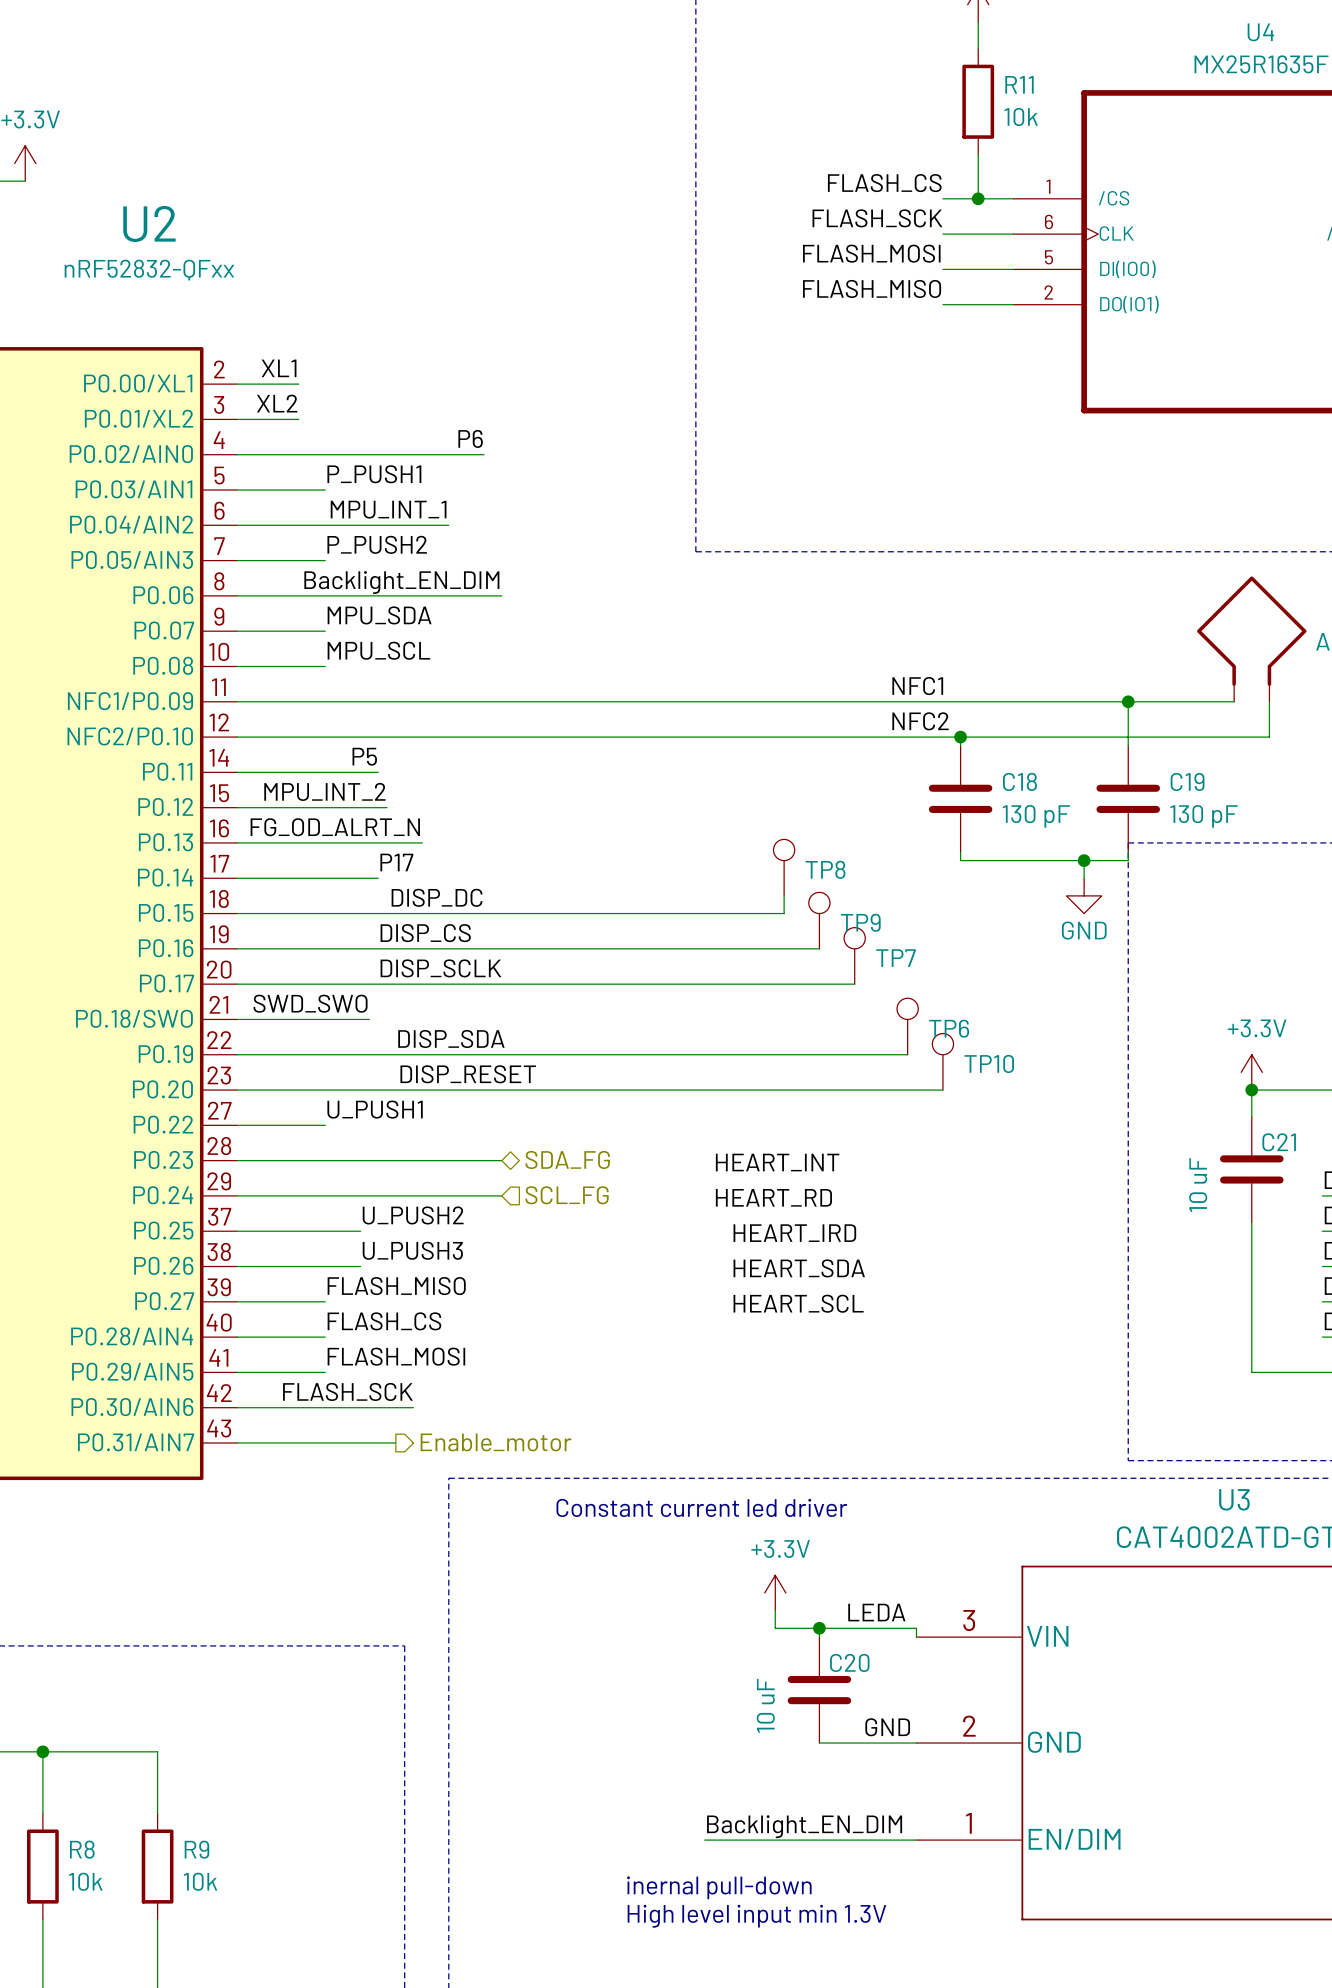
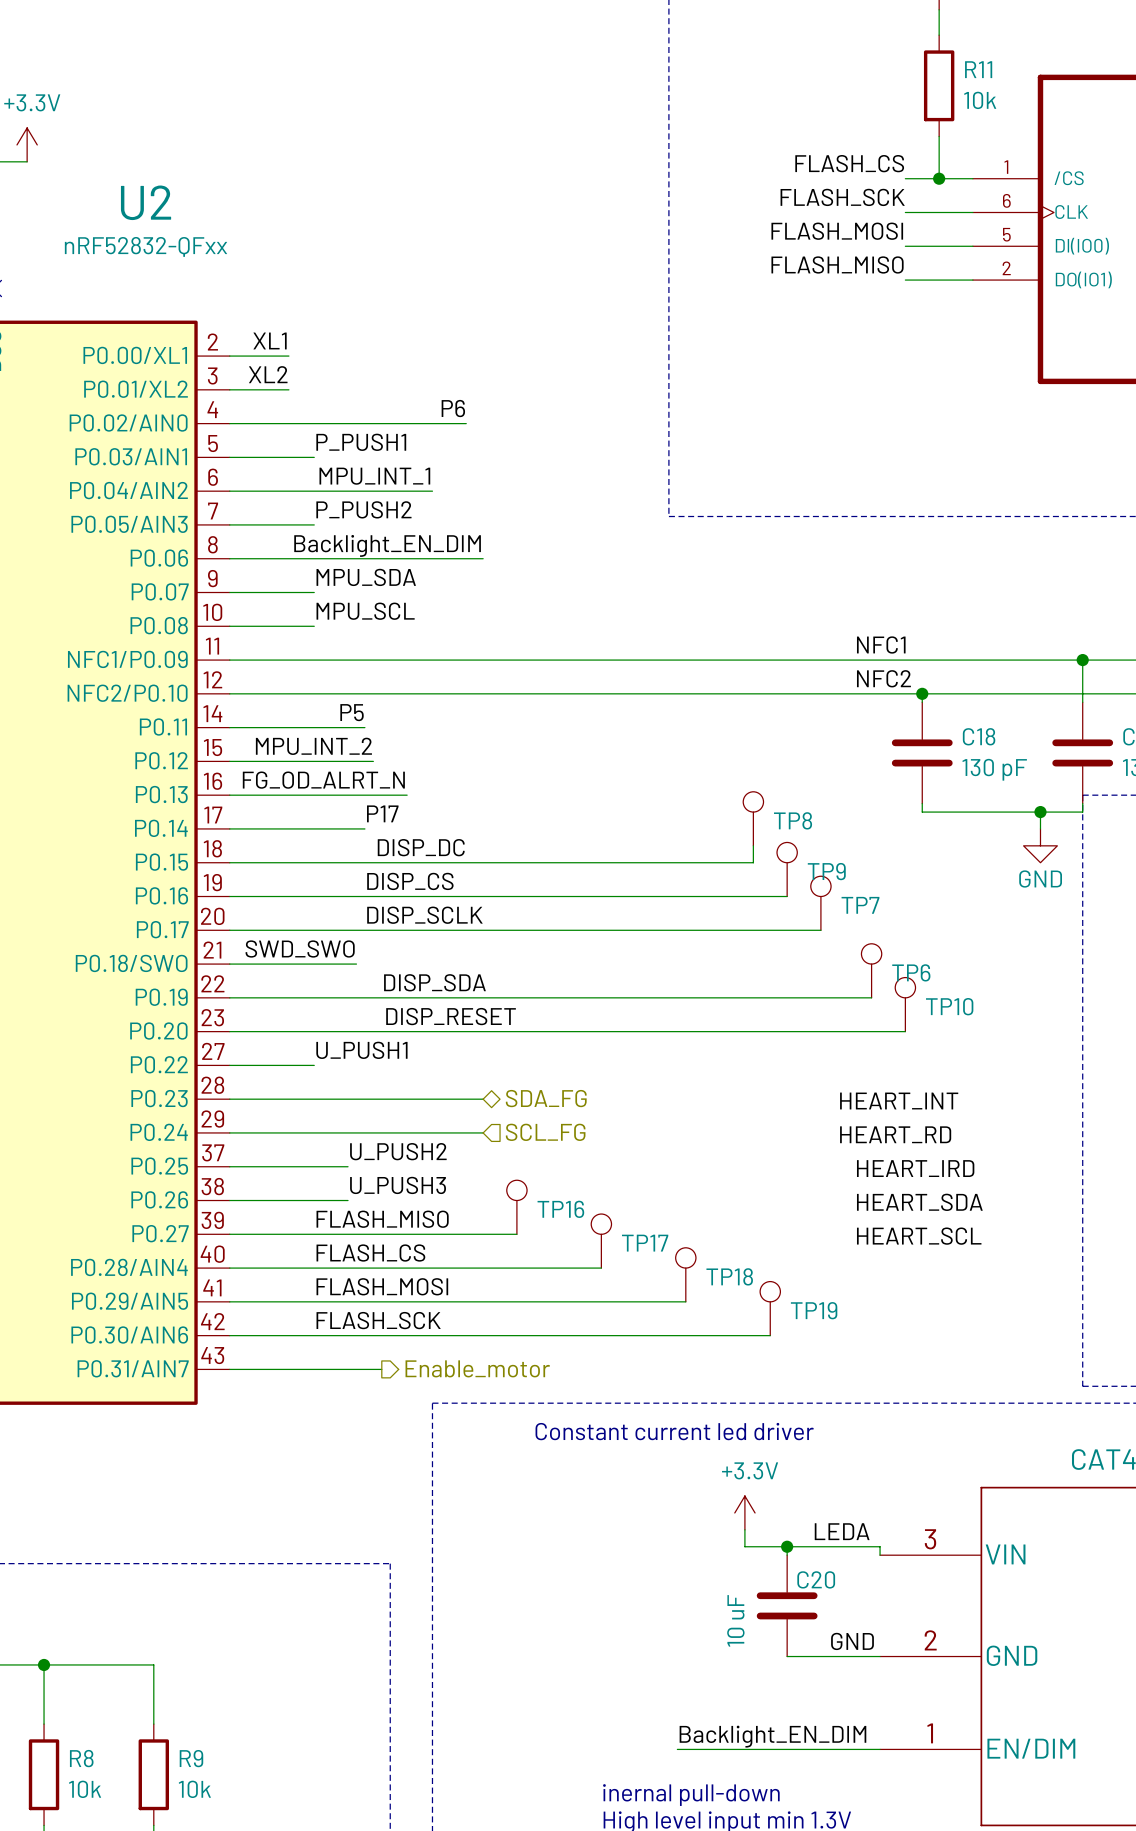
label position: HEART_INT (777, 1162) -> HEART_INT (899, 1101)
label position: HEART_RD (773, 1197) -> HEART_RD (895, 1134)
label position: HEART_IRD (794, 1233) -> HEART_IRD (915, 1168)
label position: HEART_SDA (799, 1268) -> HEART_SDA (919, 1202)
TP16: none -> (516, 1207)
wire: none -> (314, 1234) (516, 1234)
label position: HEART_SCL (798, 1303) -> HEART_SCL (919, 1236)
TP17: none -> (601, 1241)
wire: none -> (314, 1268) (601, 1268)
TP18: none -> (685, 1274)
wire: none -> (314, 1301) (685, 1301)
TP19: none -> (770, 1308)
label position: FLASH_SCK (347, 1391) -> FLASH_SCK (378, 1320)
wire: none -> (398, 1335) (770, 1335)

